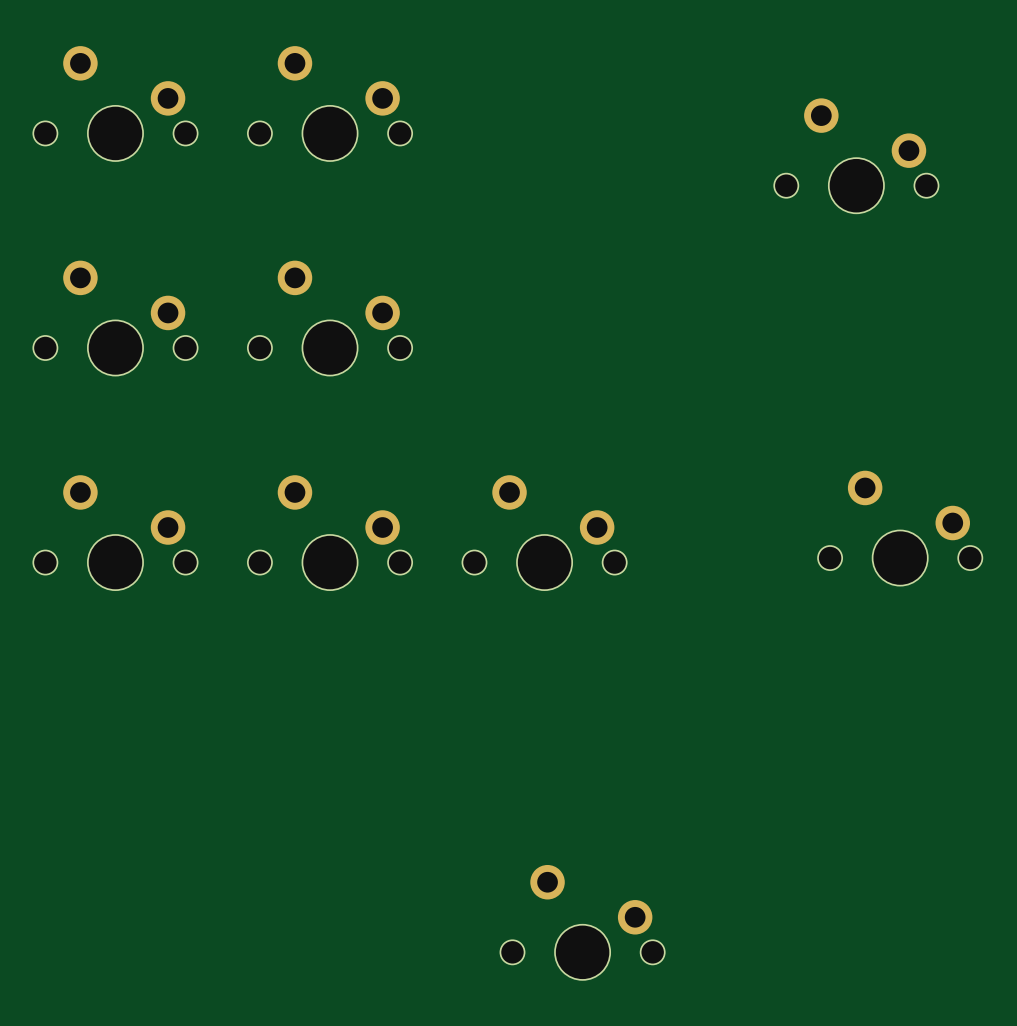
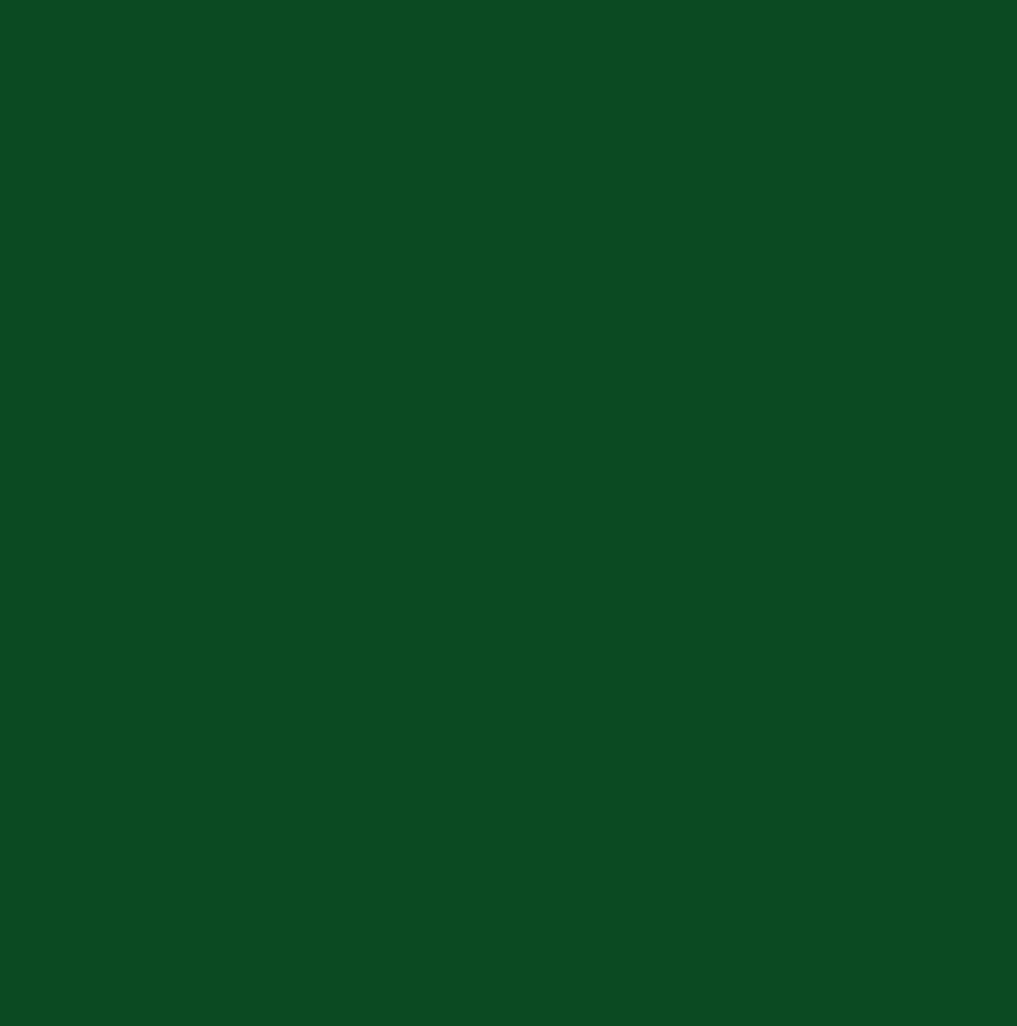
part: (115, 103) -> none
part: (330, 103) -> none
part: (856, 155) -> none
part: (115, 318) -> none
part: (330, 318) -> none
part: (900, 528) -> none
part: (115, 532) -> none
part: (330, 532) -> none
part: (544, 532) -> none
part: (582, 922) -> none

